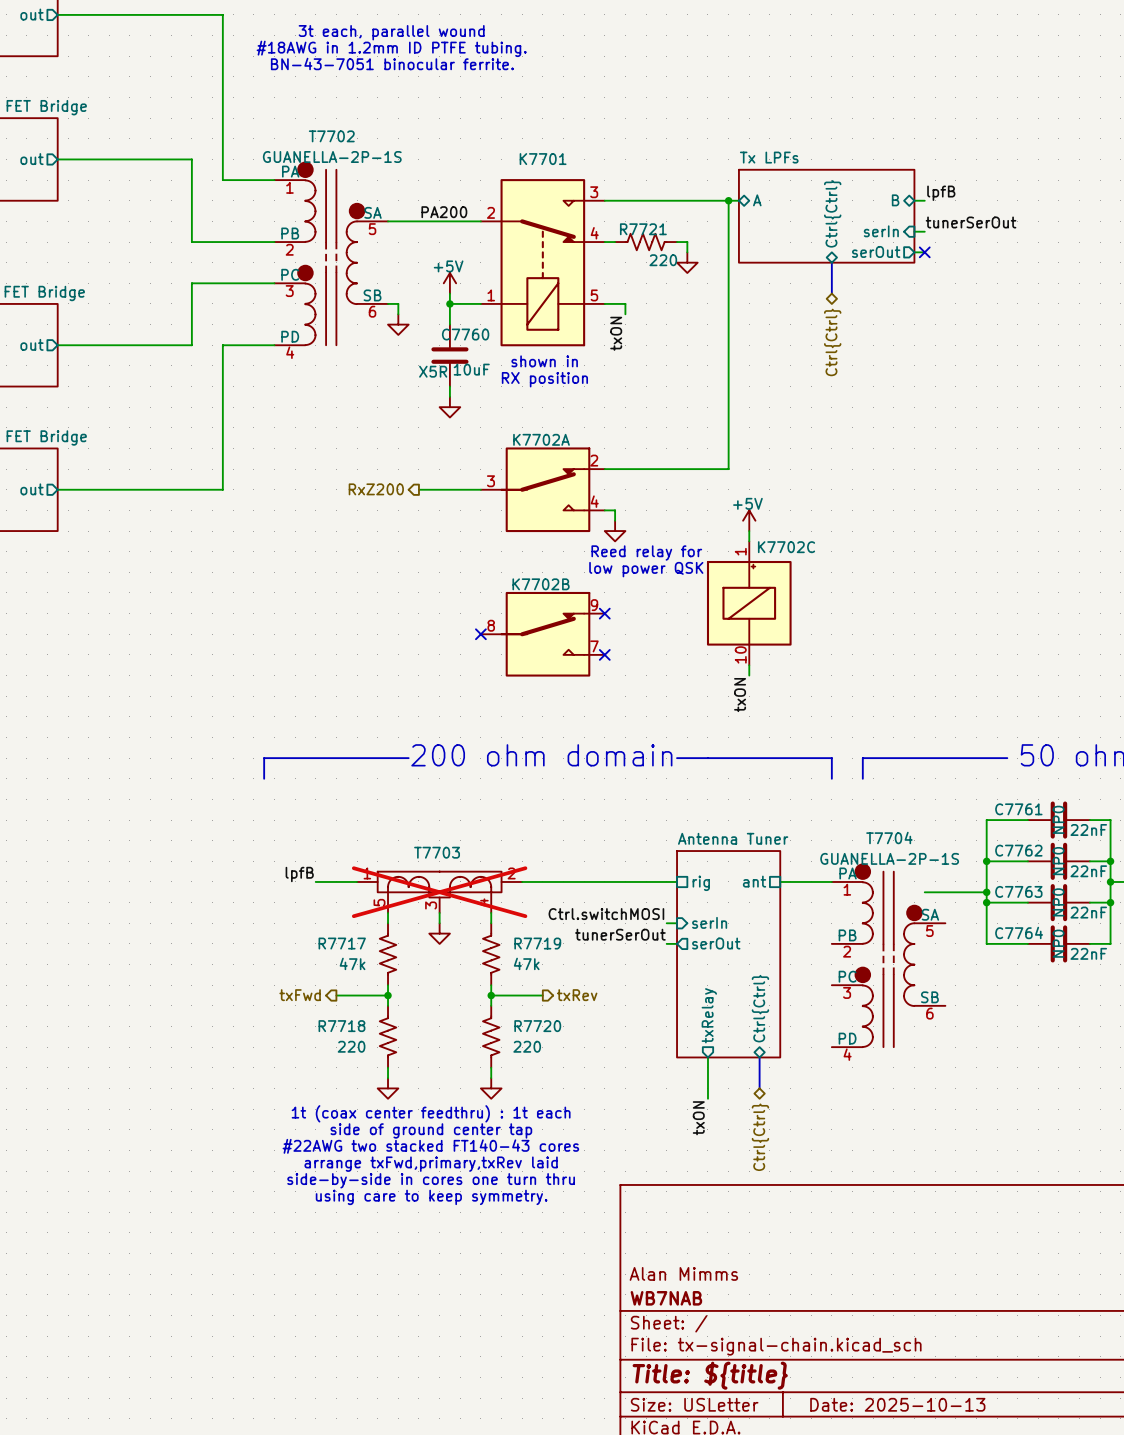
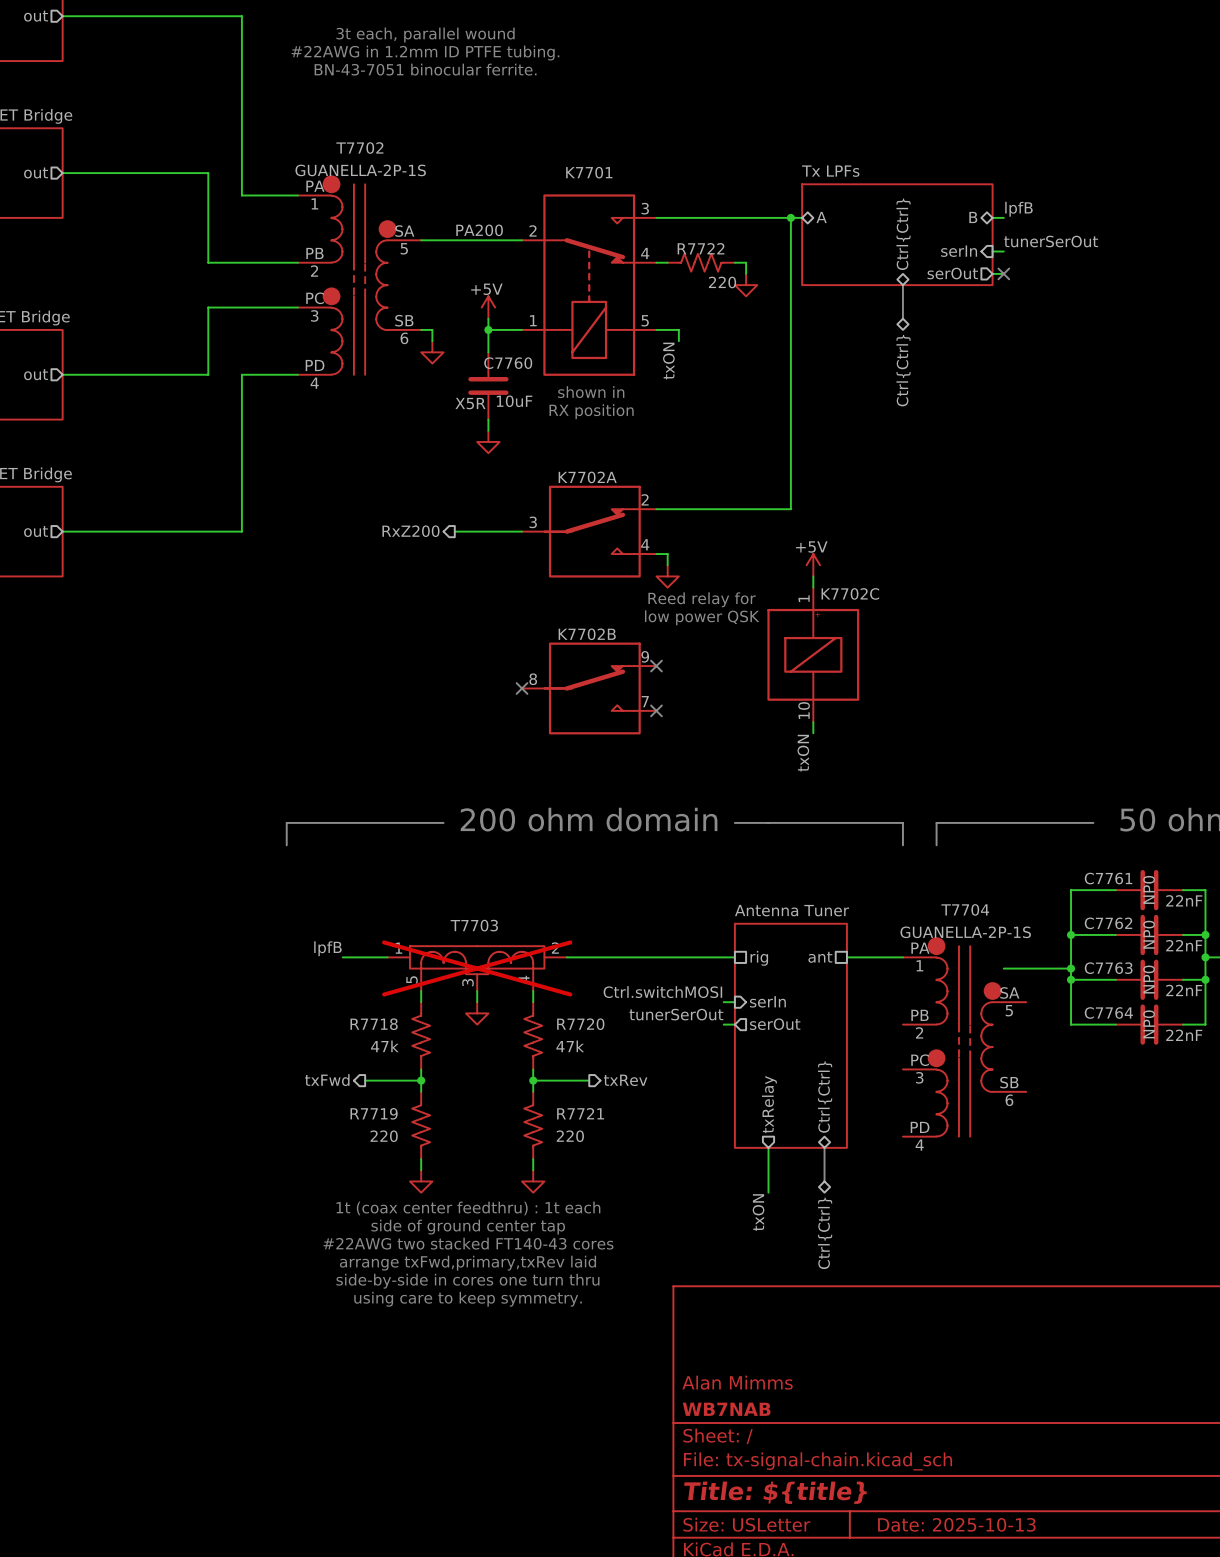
text: #18AWG in 1.2mm ID PTFE tubing. (391, 48) -> #22AWG in 1.2mm ID PTFE tubing. (425, 53)
R7721 name: R7721 (643, 229) -> R7722 (701, 248)
R7717 name: R7717 (342, 943) -> R7718 (374, 1024)
R7719 name: R7719 (537, 943) -> R7720 (580, 1024)
R7718 name: R7718 (341, 1026) -> R7719 (374, 1113)
R7720 name: R7720 (537, 1026) -> R7721 (580, 1113)

